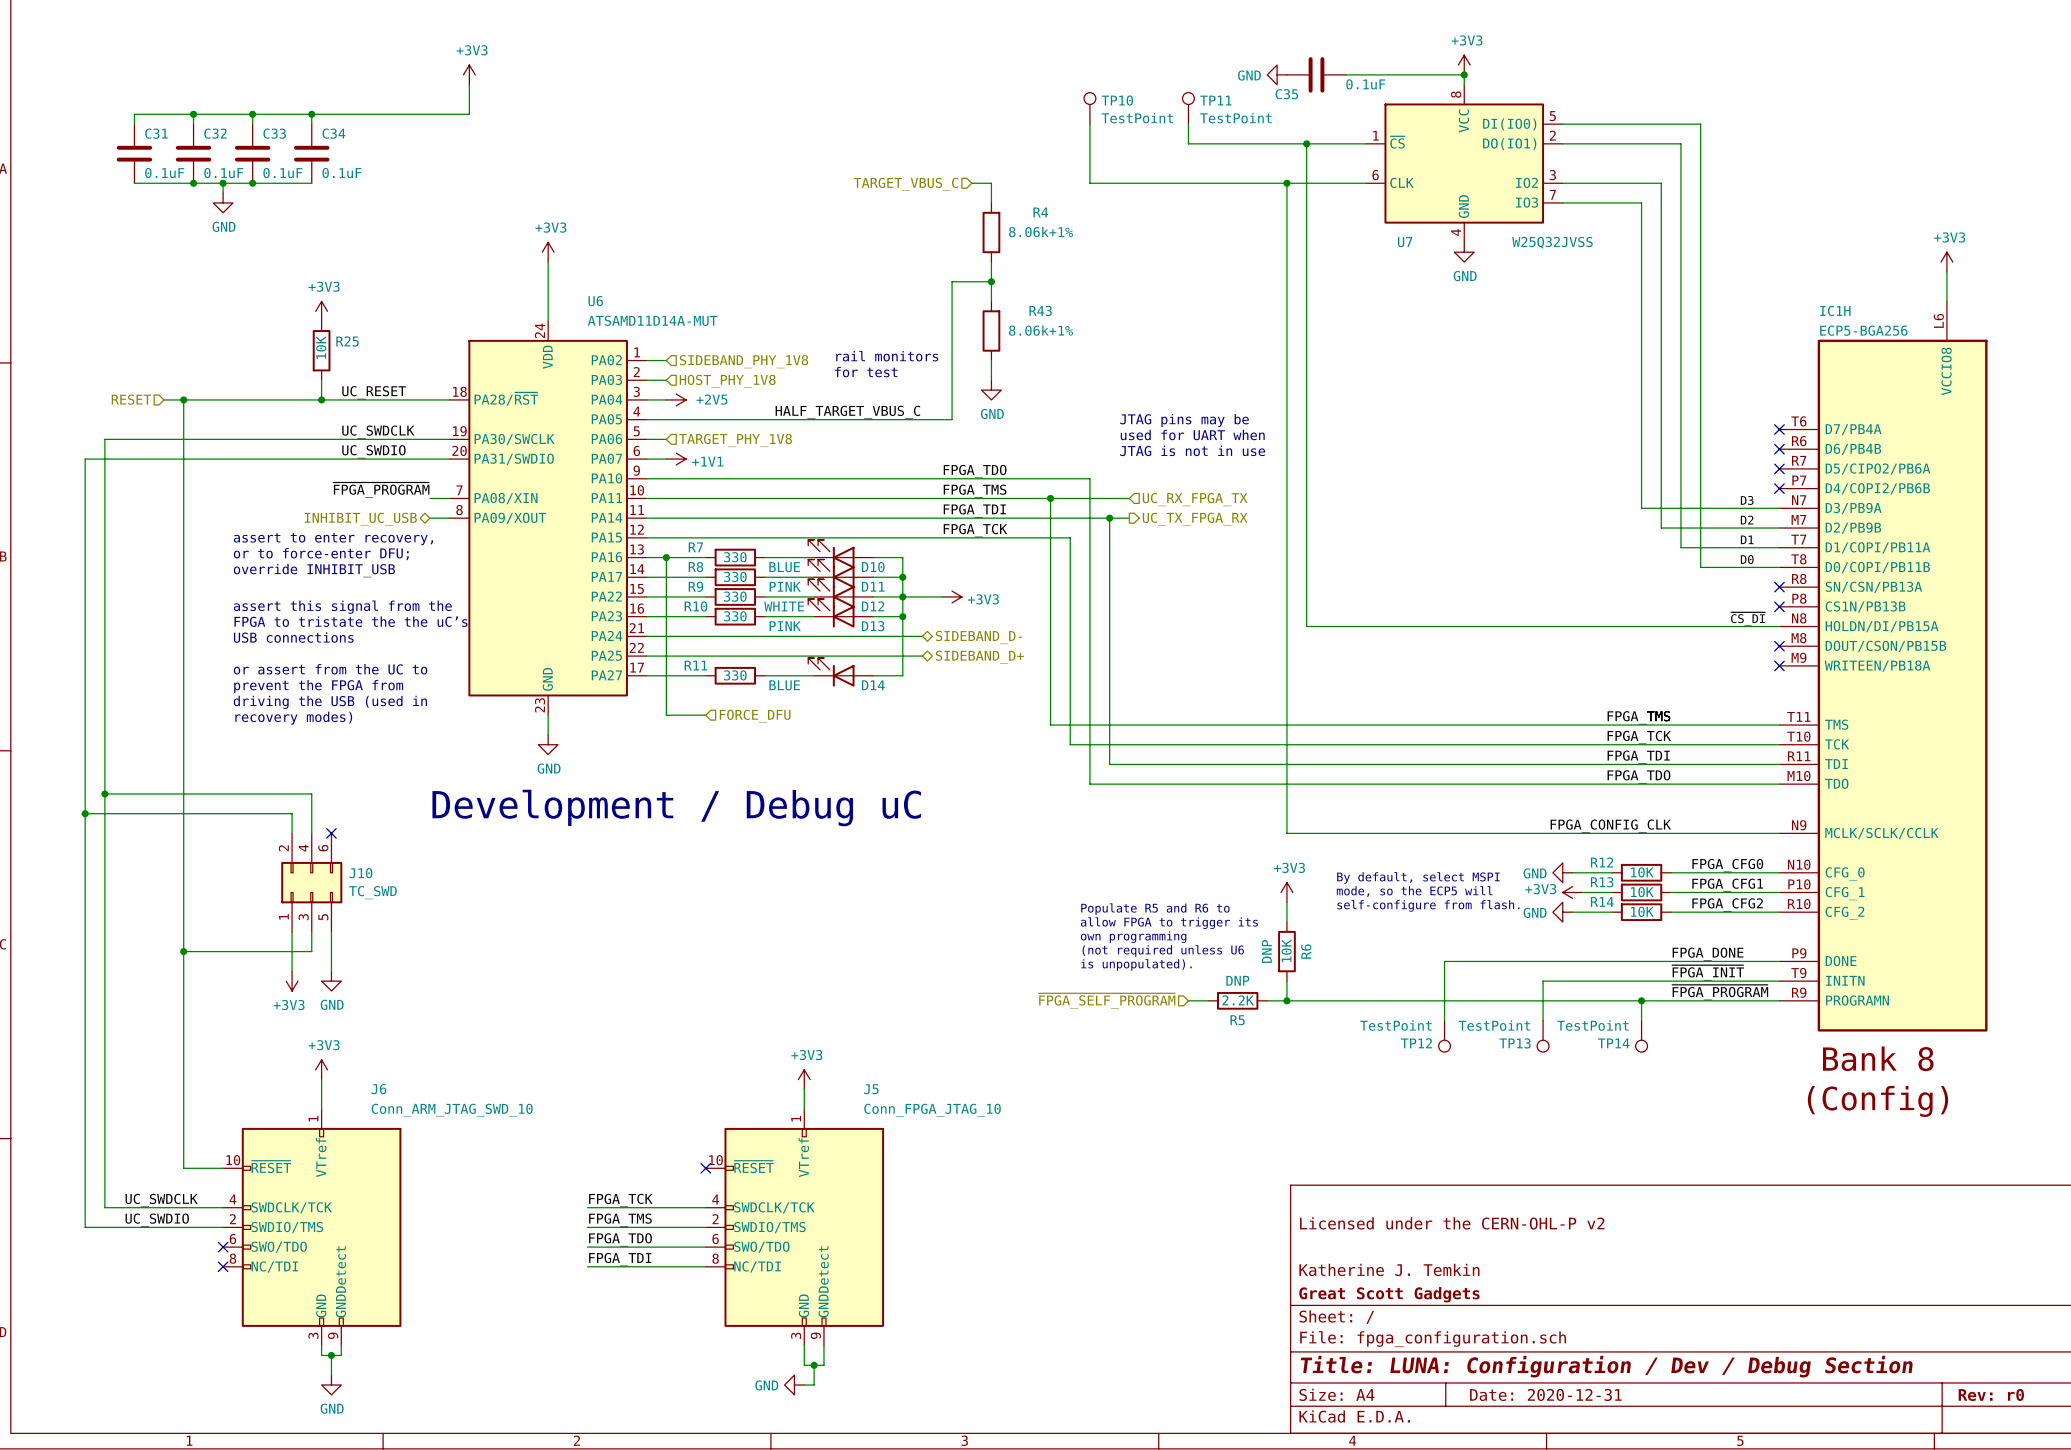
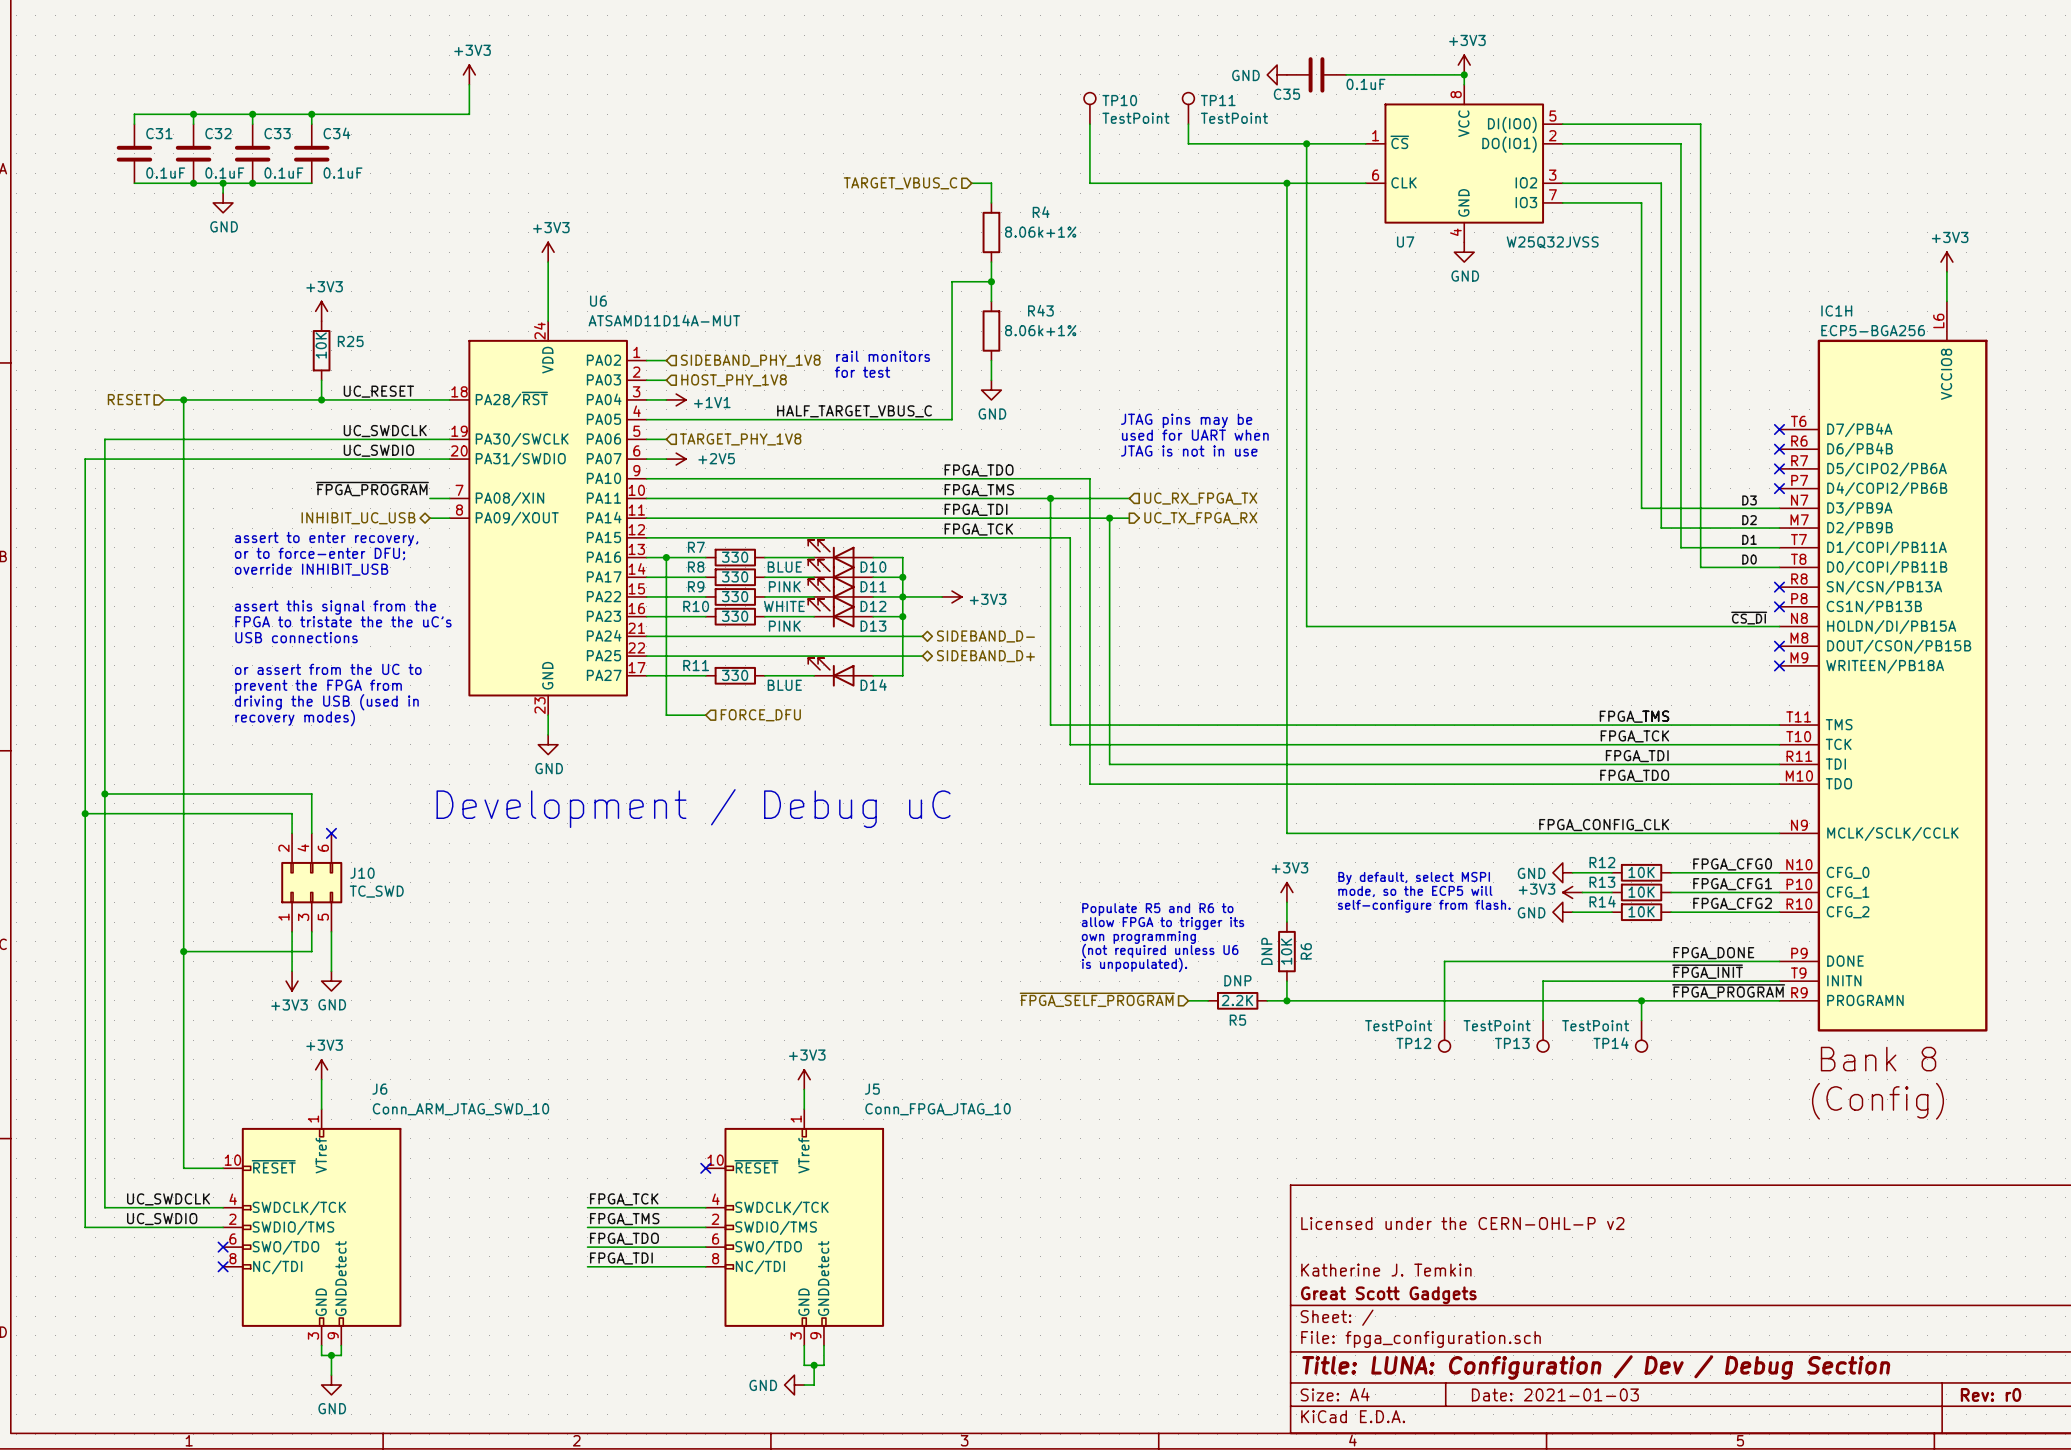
power symbol: +2V5 (676, 399) -> +1V1 (676, 399)
power symbol: +1V1 (676, 459) -> +2V5 (676, 459)
title block: Date: 2020-12-31 (1545, 1394) -> Date: 2021-01-03 (1555, 1394)

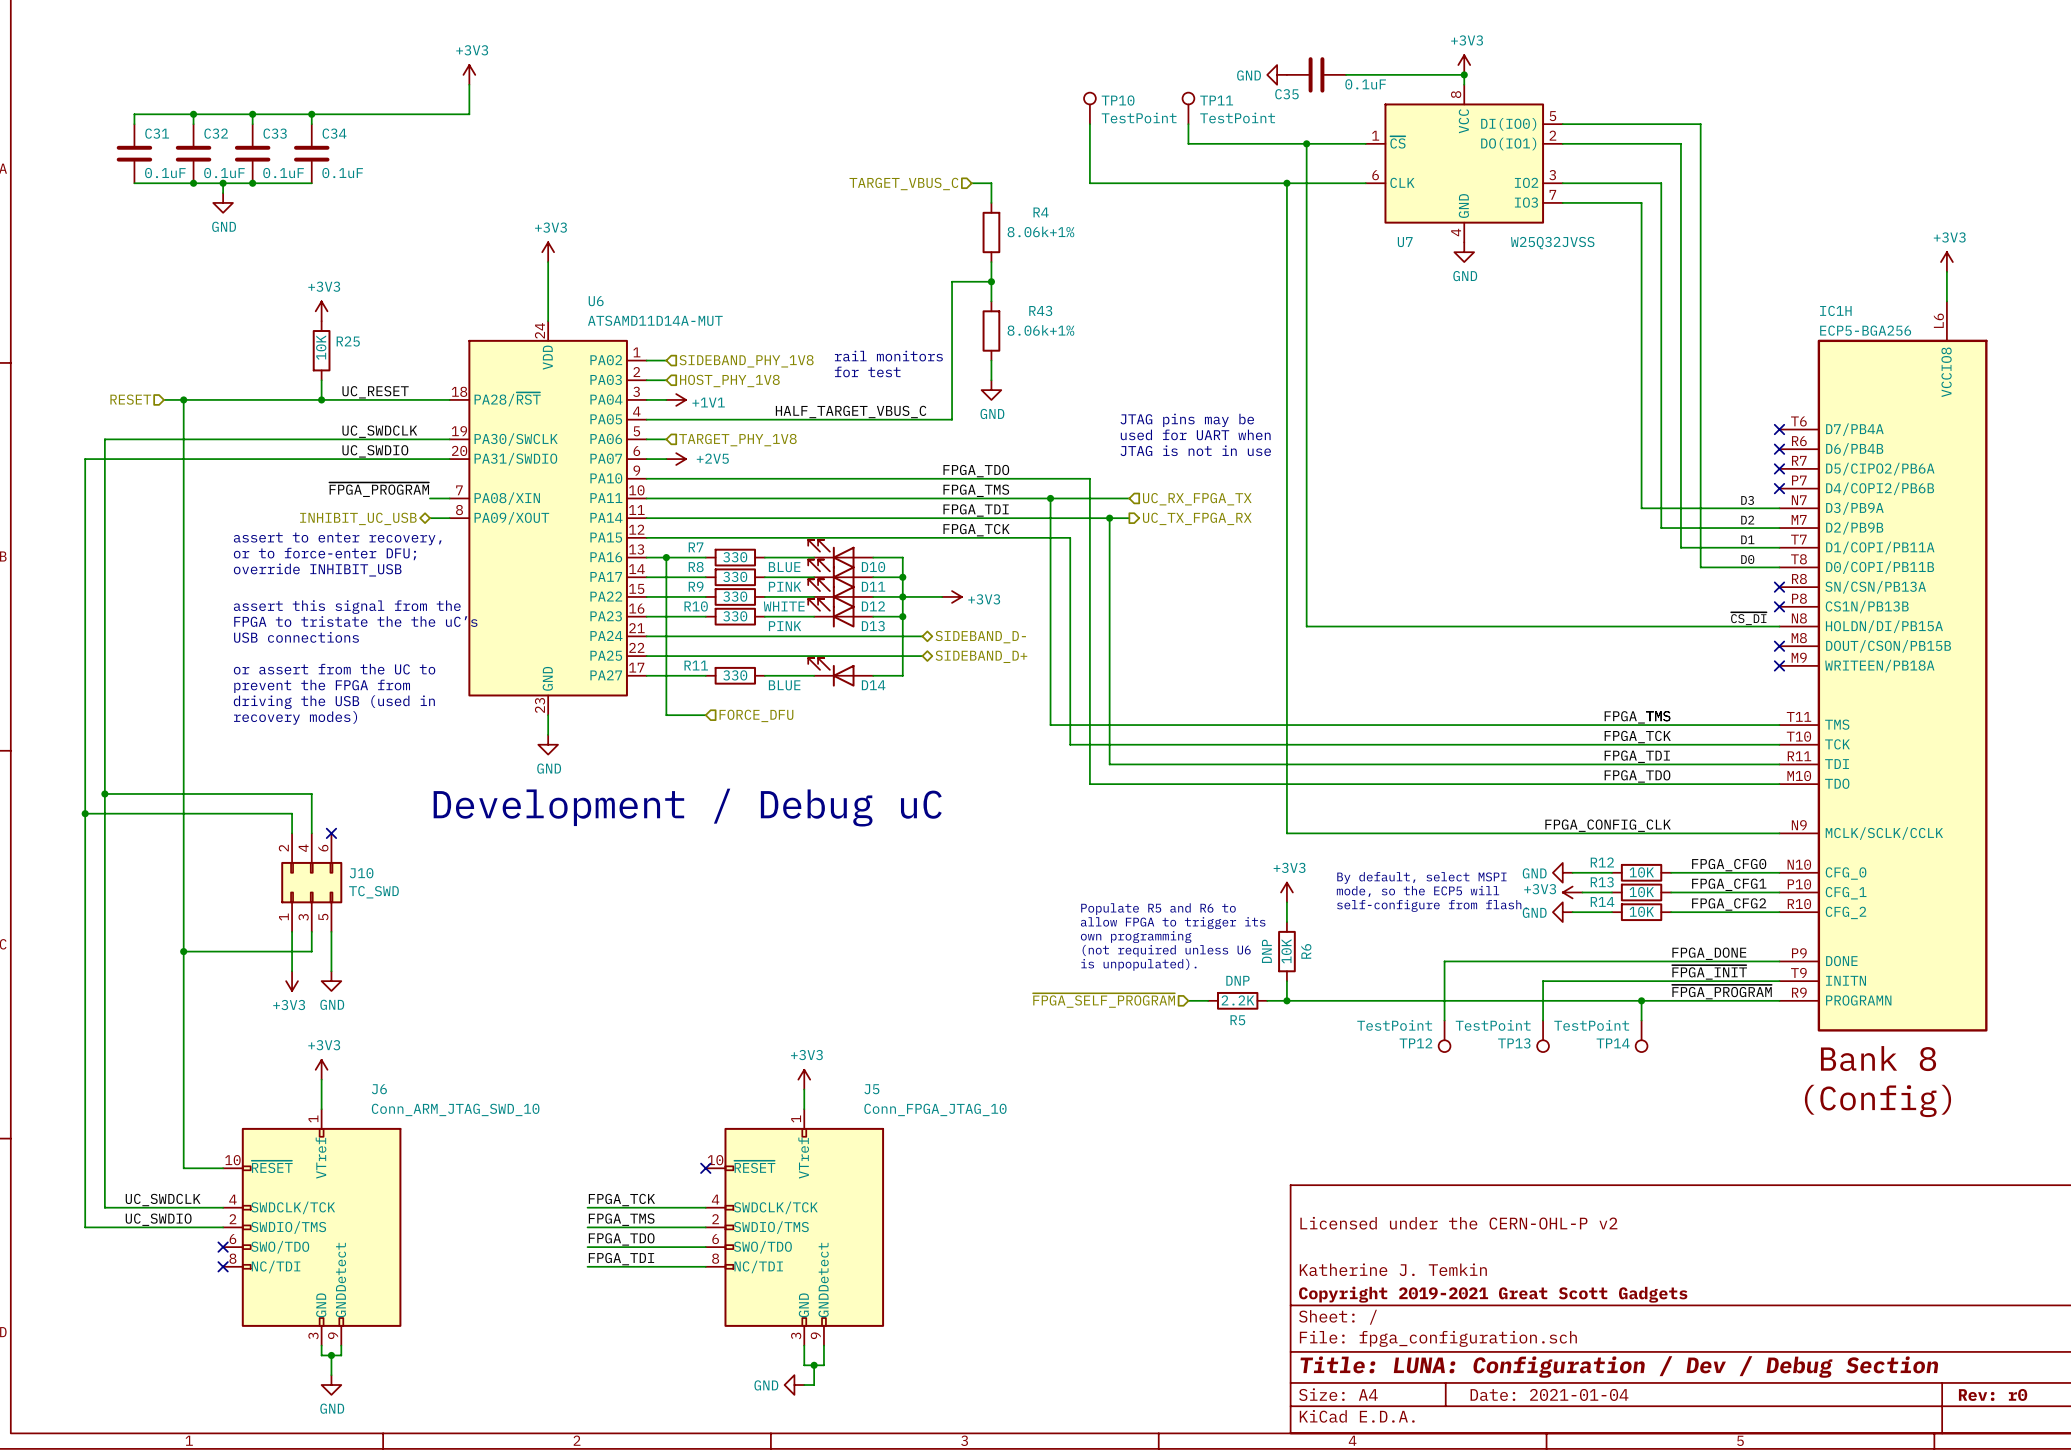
title block: Great Scott Gadgets (1388, 1295) -> Copyright 2019-2021 Great Scott Gadgets (1493, 1294)
title block: Date: 2021-01-03 (1555, 1394) -> Date: 2021-01-04 (1549, 1394)

